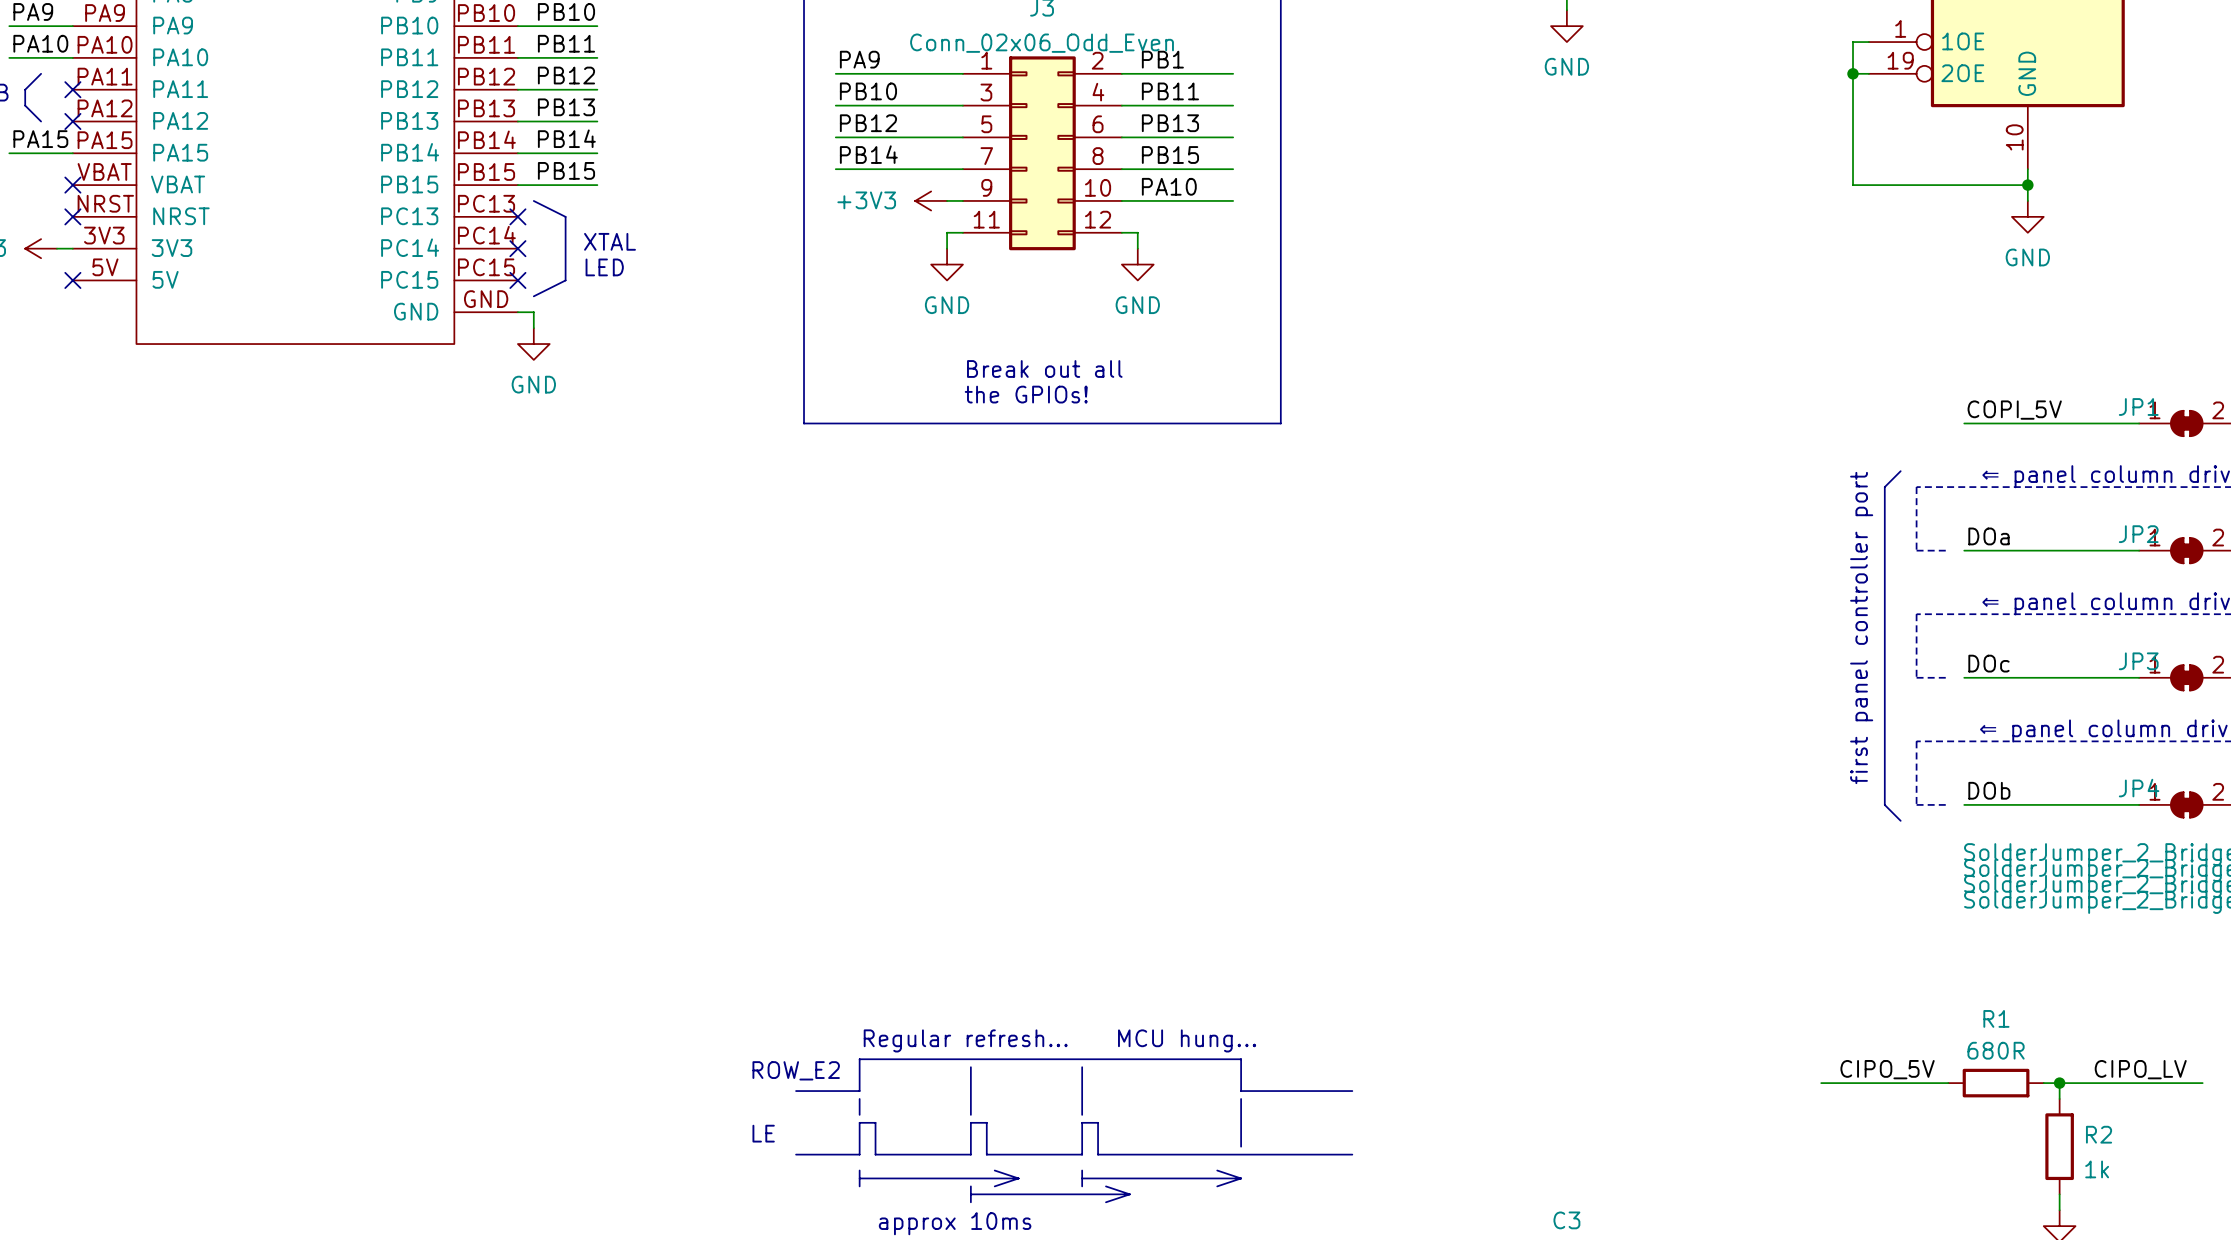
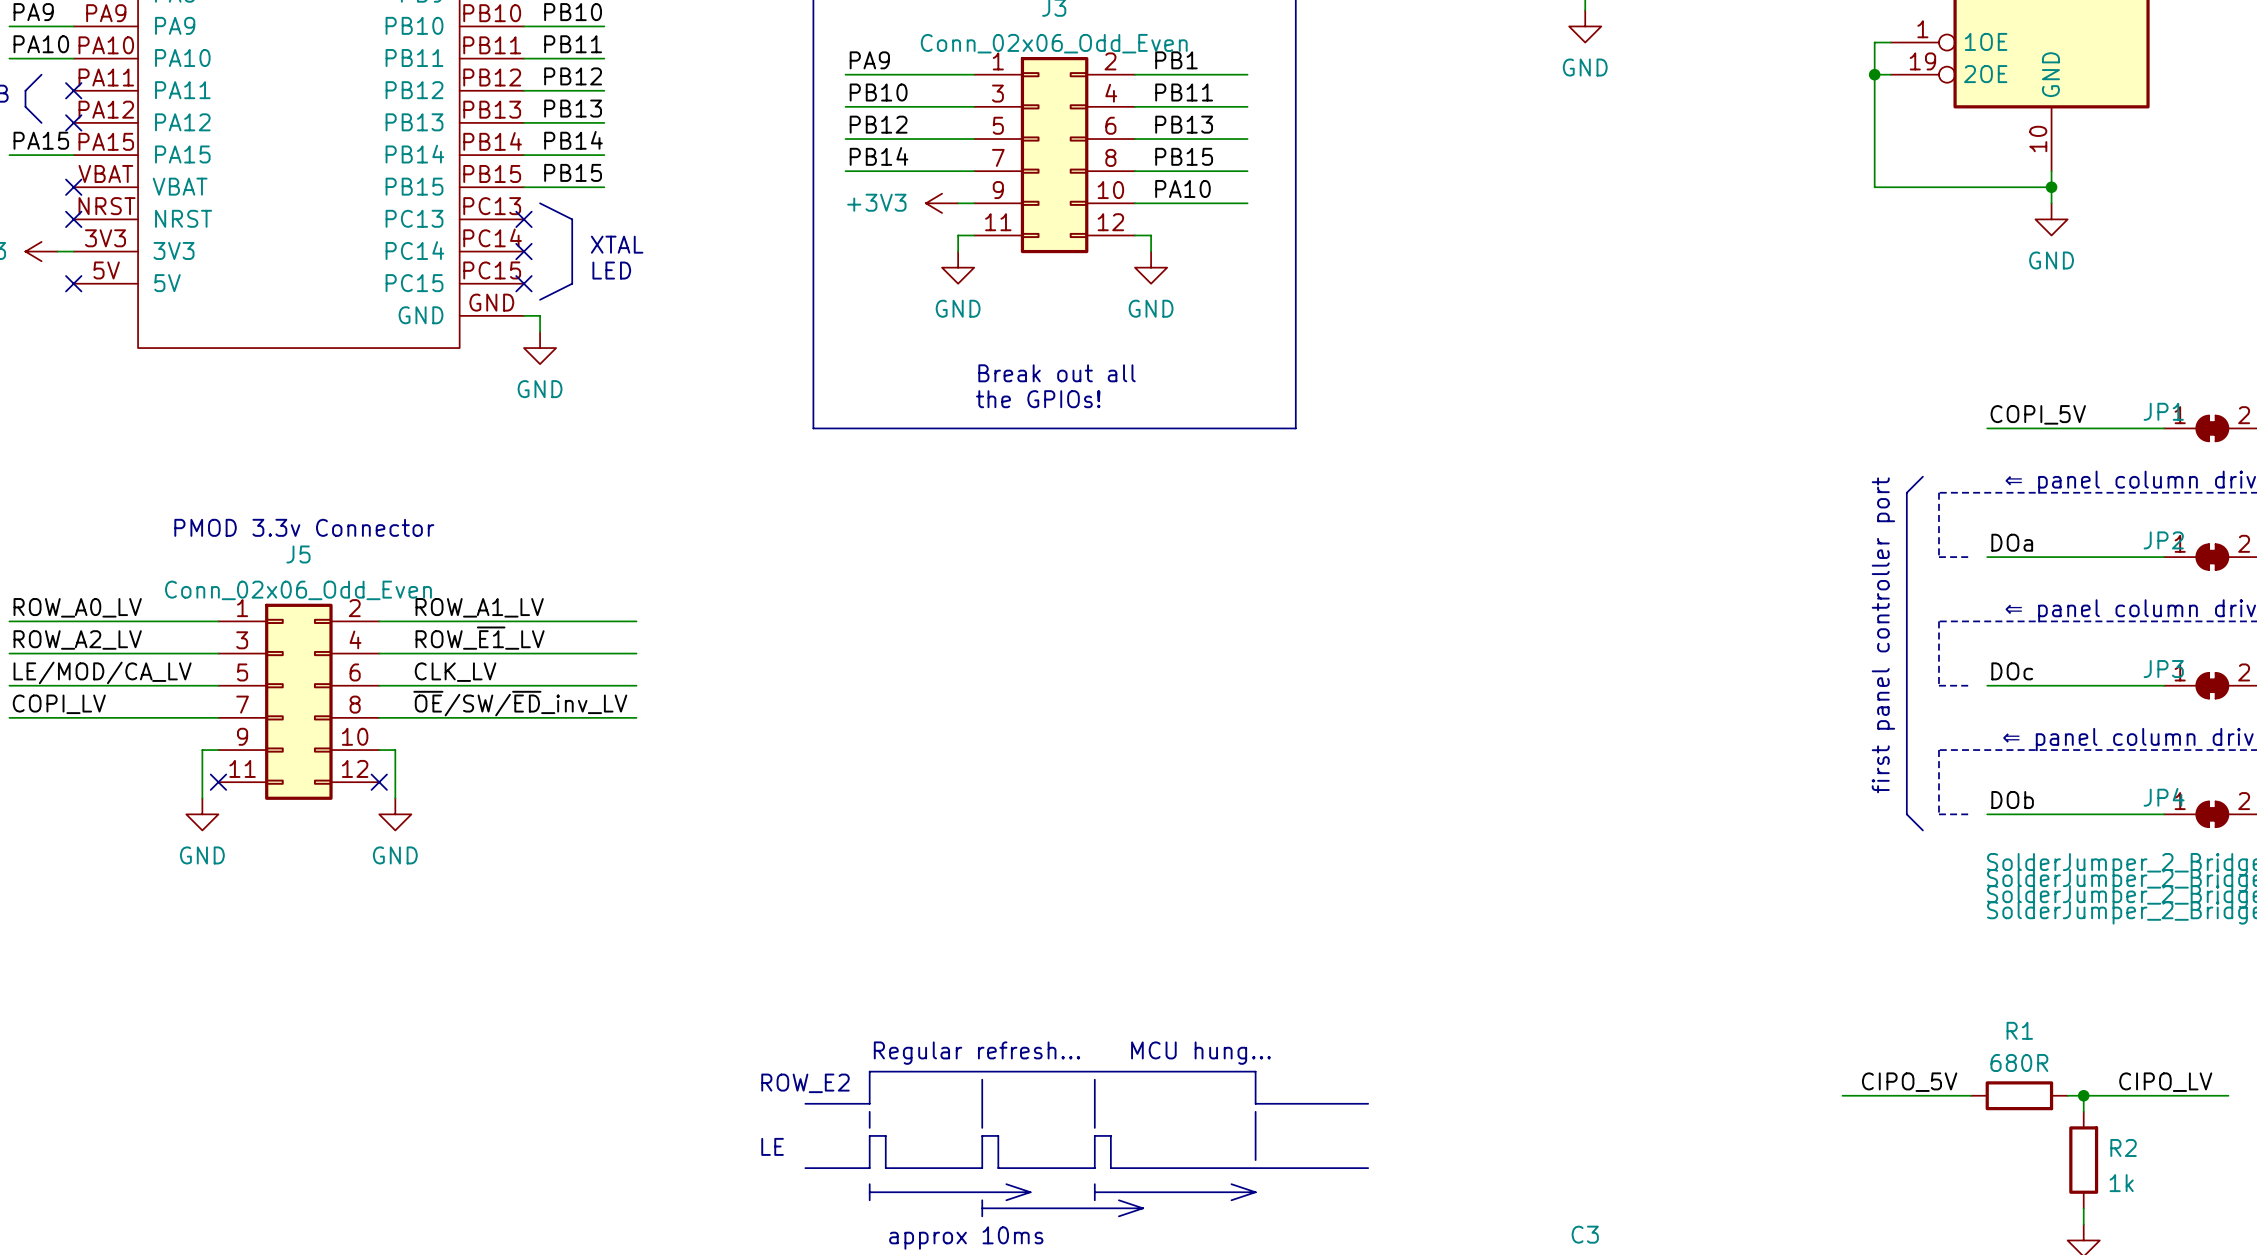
text: none -> PMOD 3.3v Connector (304, 527)
label: none -> ROW_A0_LV (77, 607)
label: none -> ROW_A1_LV (479, 607)
wire: none -> (9, 621) (218, 621)
wire: none -> (379, 621) (636, 621)
label: none -> ROW_~{E1}_LV (480, 638)
label: none -> ROW_A2_LV (77, 639)
wire: none -> (9, 653) (218, 653)
wire: none -> (379, 653) (636, 653)
label: none -> CLK_LV (455, 672)
label: none -> LE/MOD/CA_LV (102, 672)
wire: none -> (9, 685) (218, 685)
wire: none -> (379, 685) (636, 685)
J5: none -> Conn_02x06_Odd_Even (298, 701)
label: none -> ~{OE}/SW/~{ED}_inv_LV (520, 703)
label: none -> COPI_LV (59, 704)
wire: none -> (9, 717) (218, 717)
wire: none -> (379, 717) (636, 717)
wire: none -> (218, 750) (202, 750) (202, 798)
wire: none -> (379, 750) (395, 750) (395, 798)
no-connect mark: none -> (218, 782)
no-connect mark: none -> (379, 782)
power symbol: none -> GND (202, 814)
power symbol: none -> GND (395, 814)

